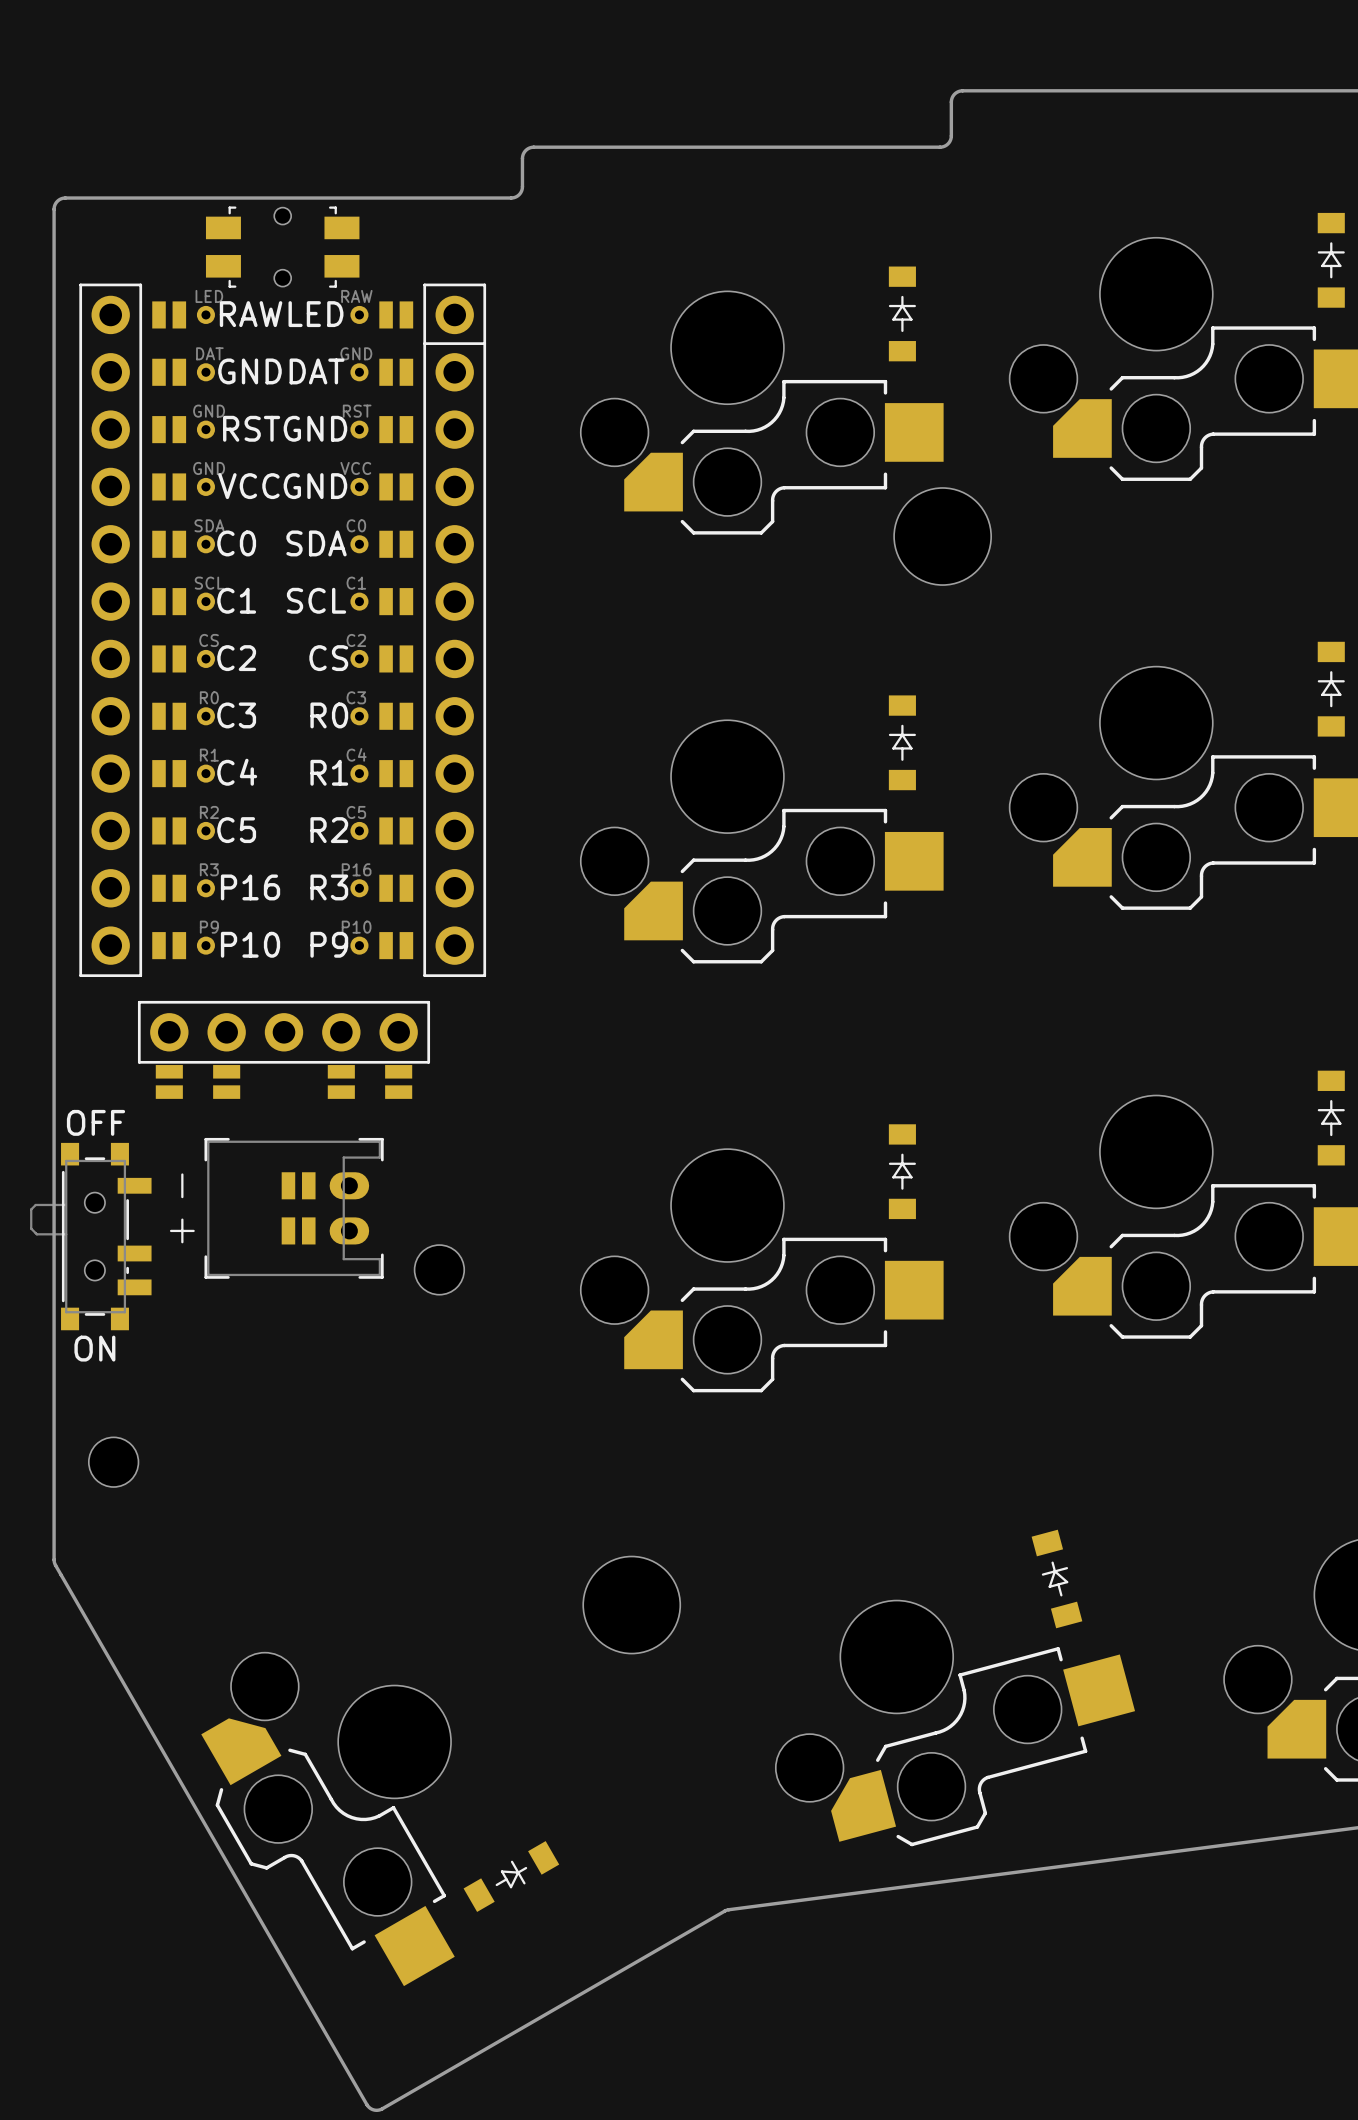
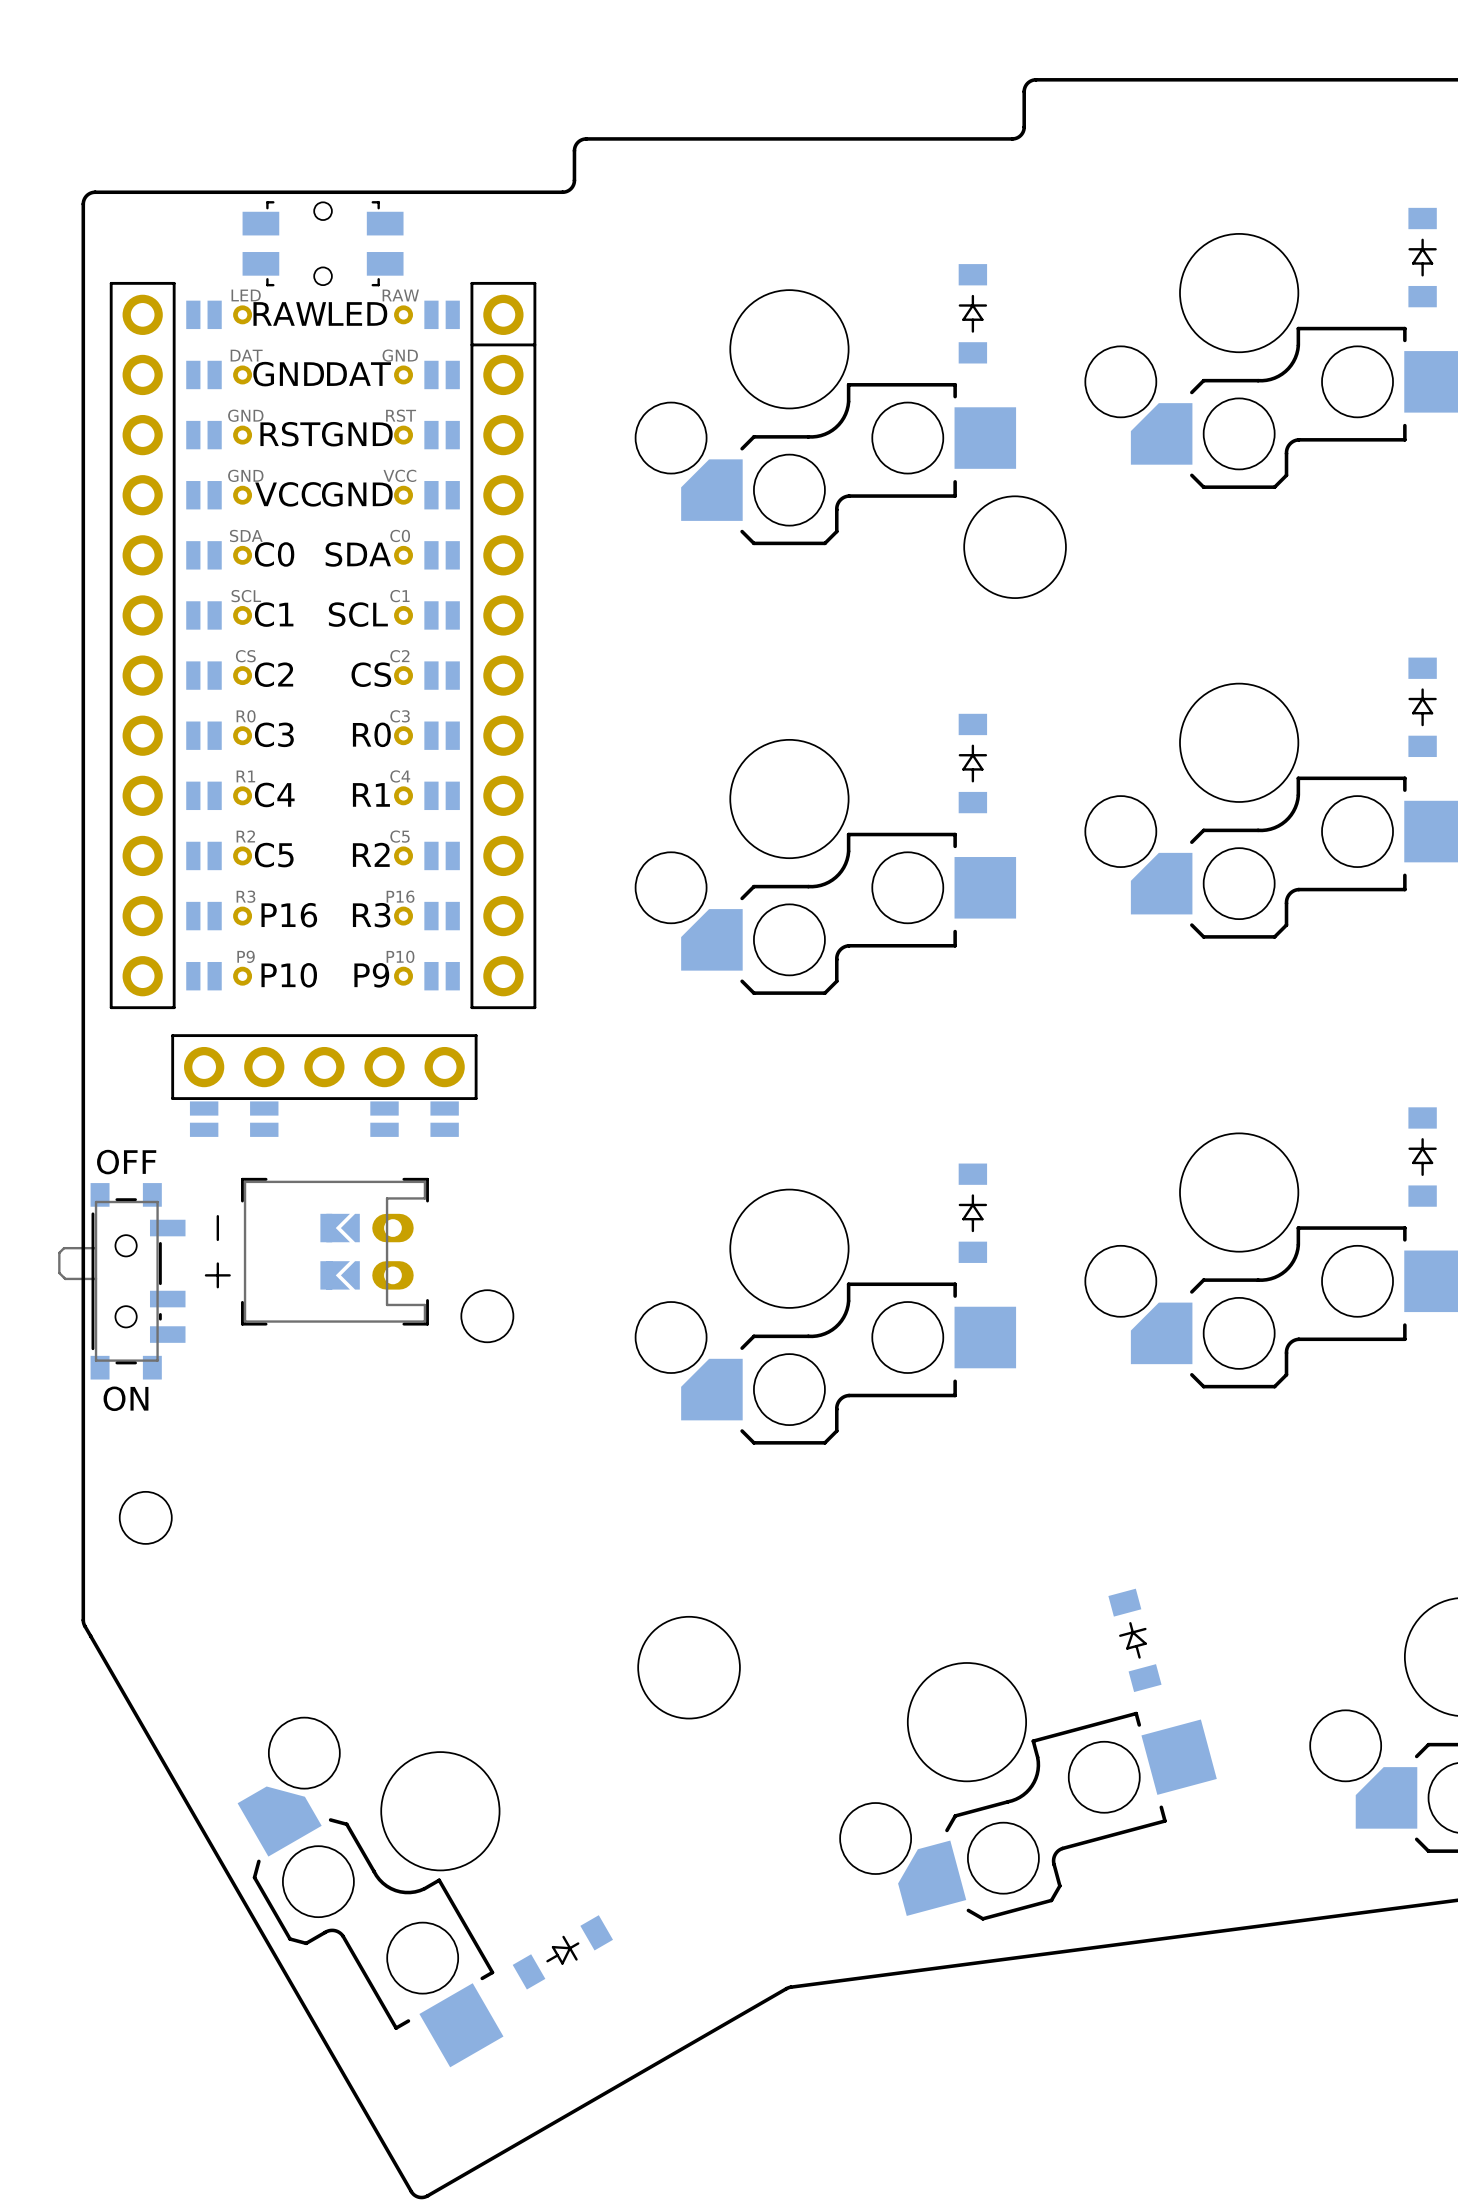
part footprint: [169, 1137, 384, 1279] -> [204, 1177, 429, 1326]

